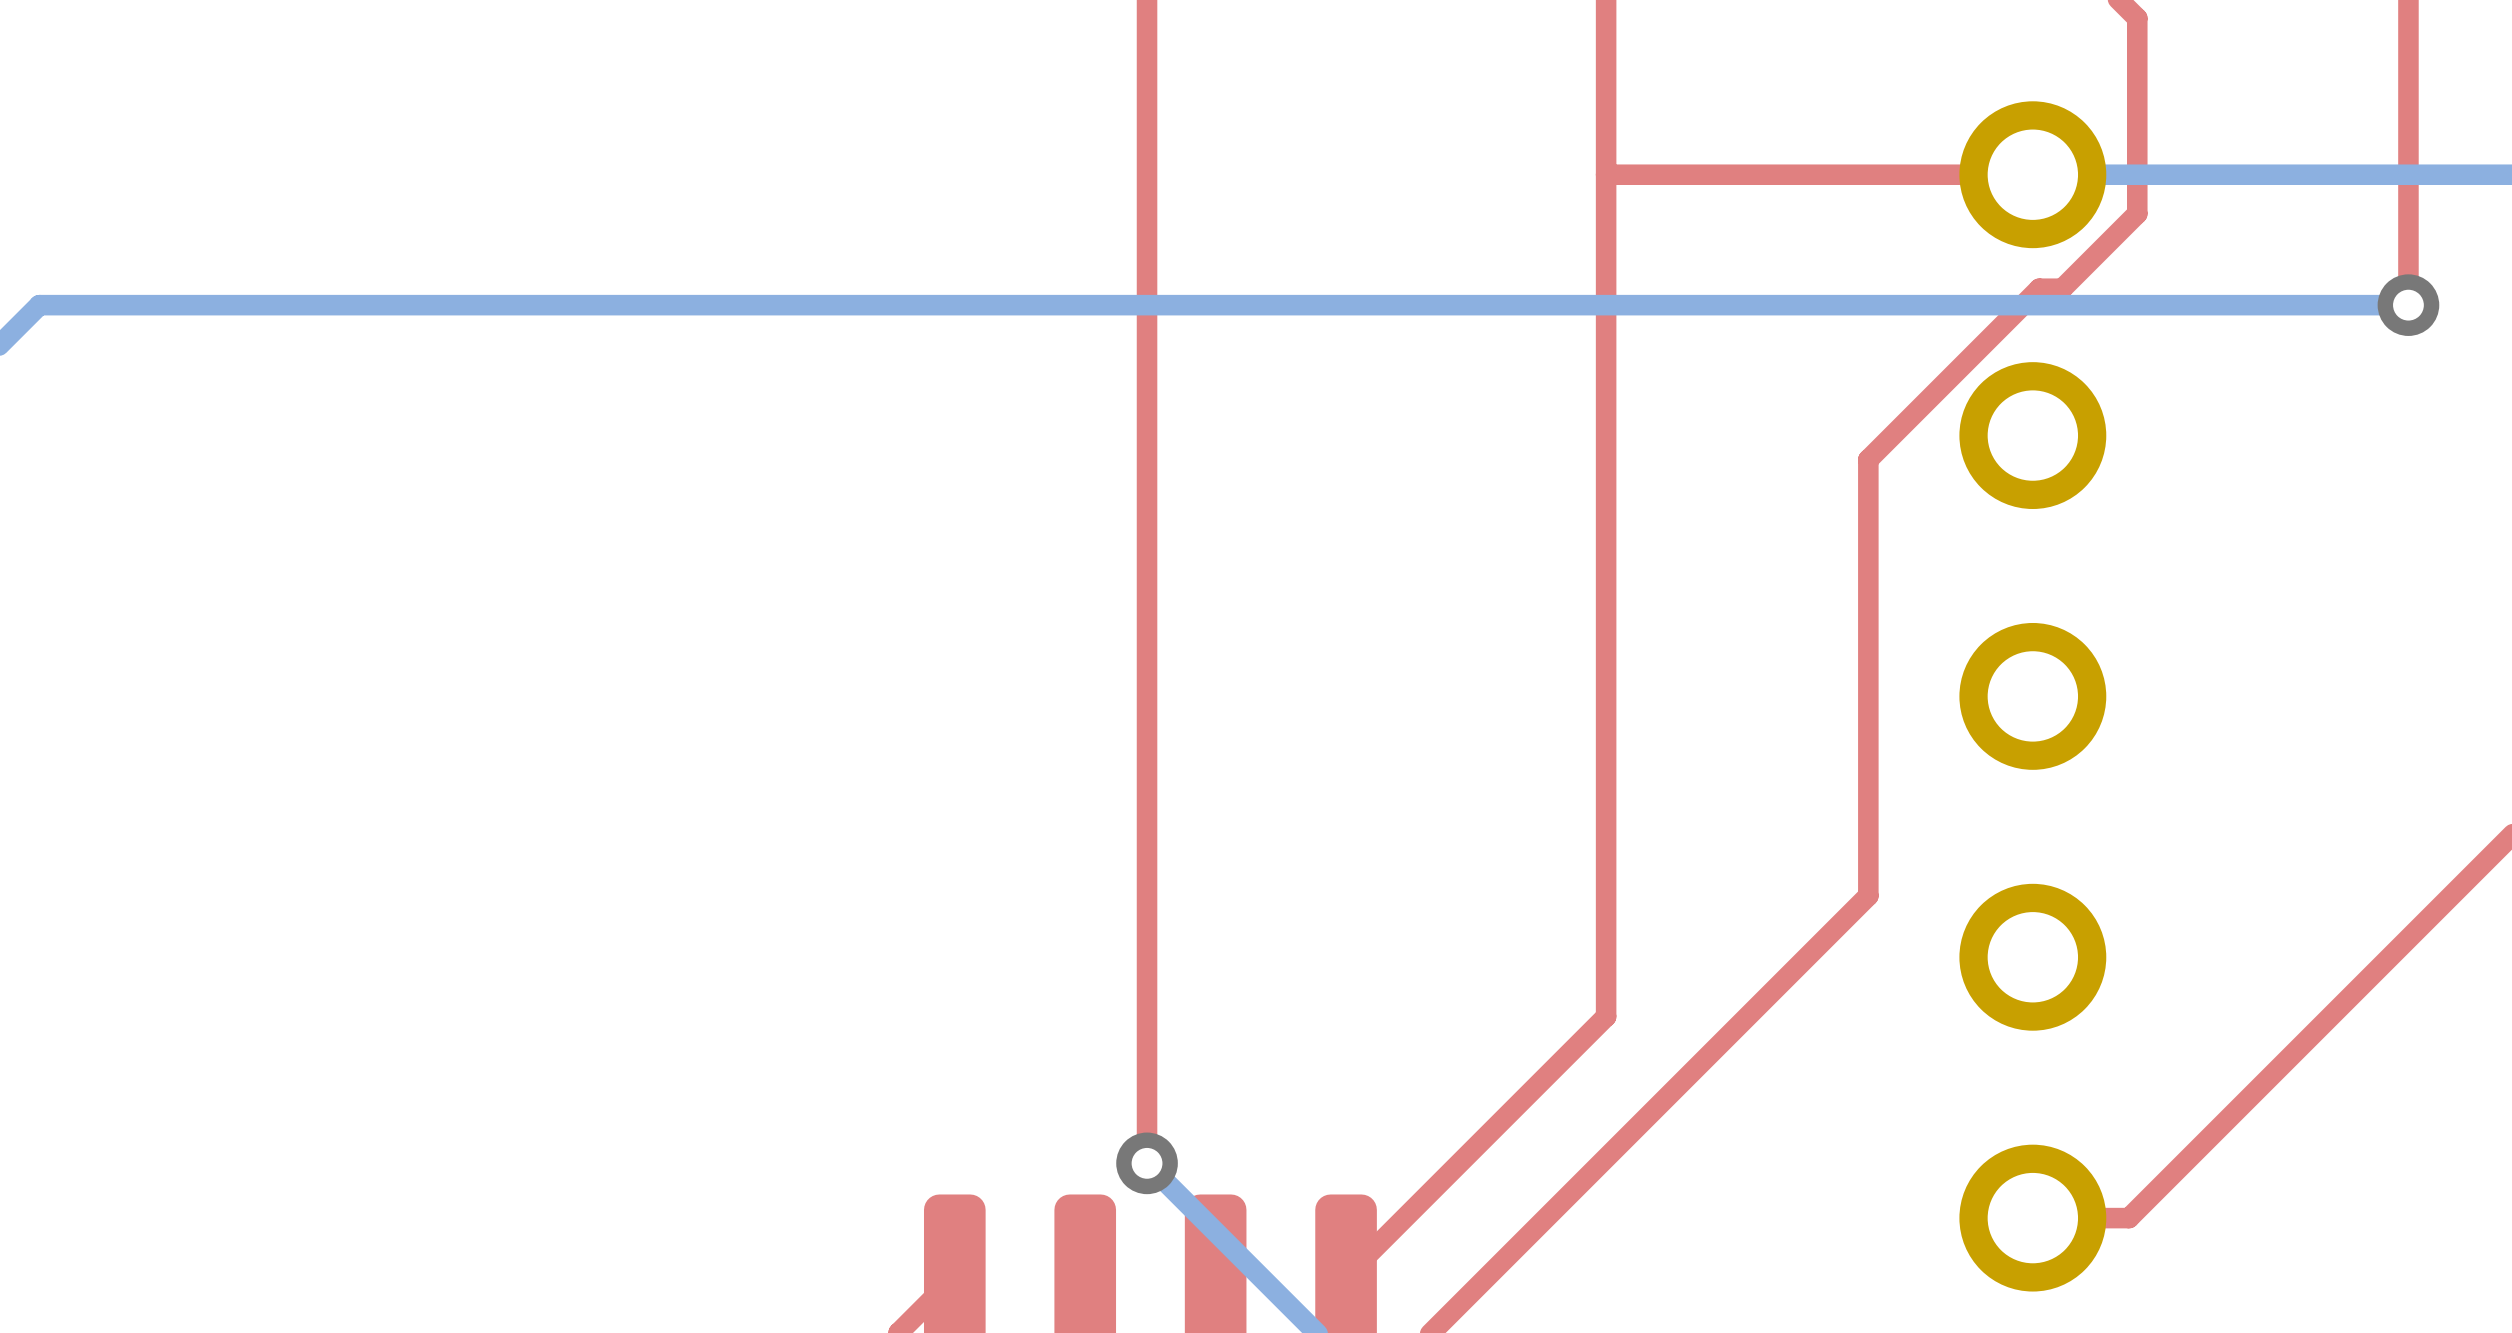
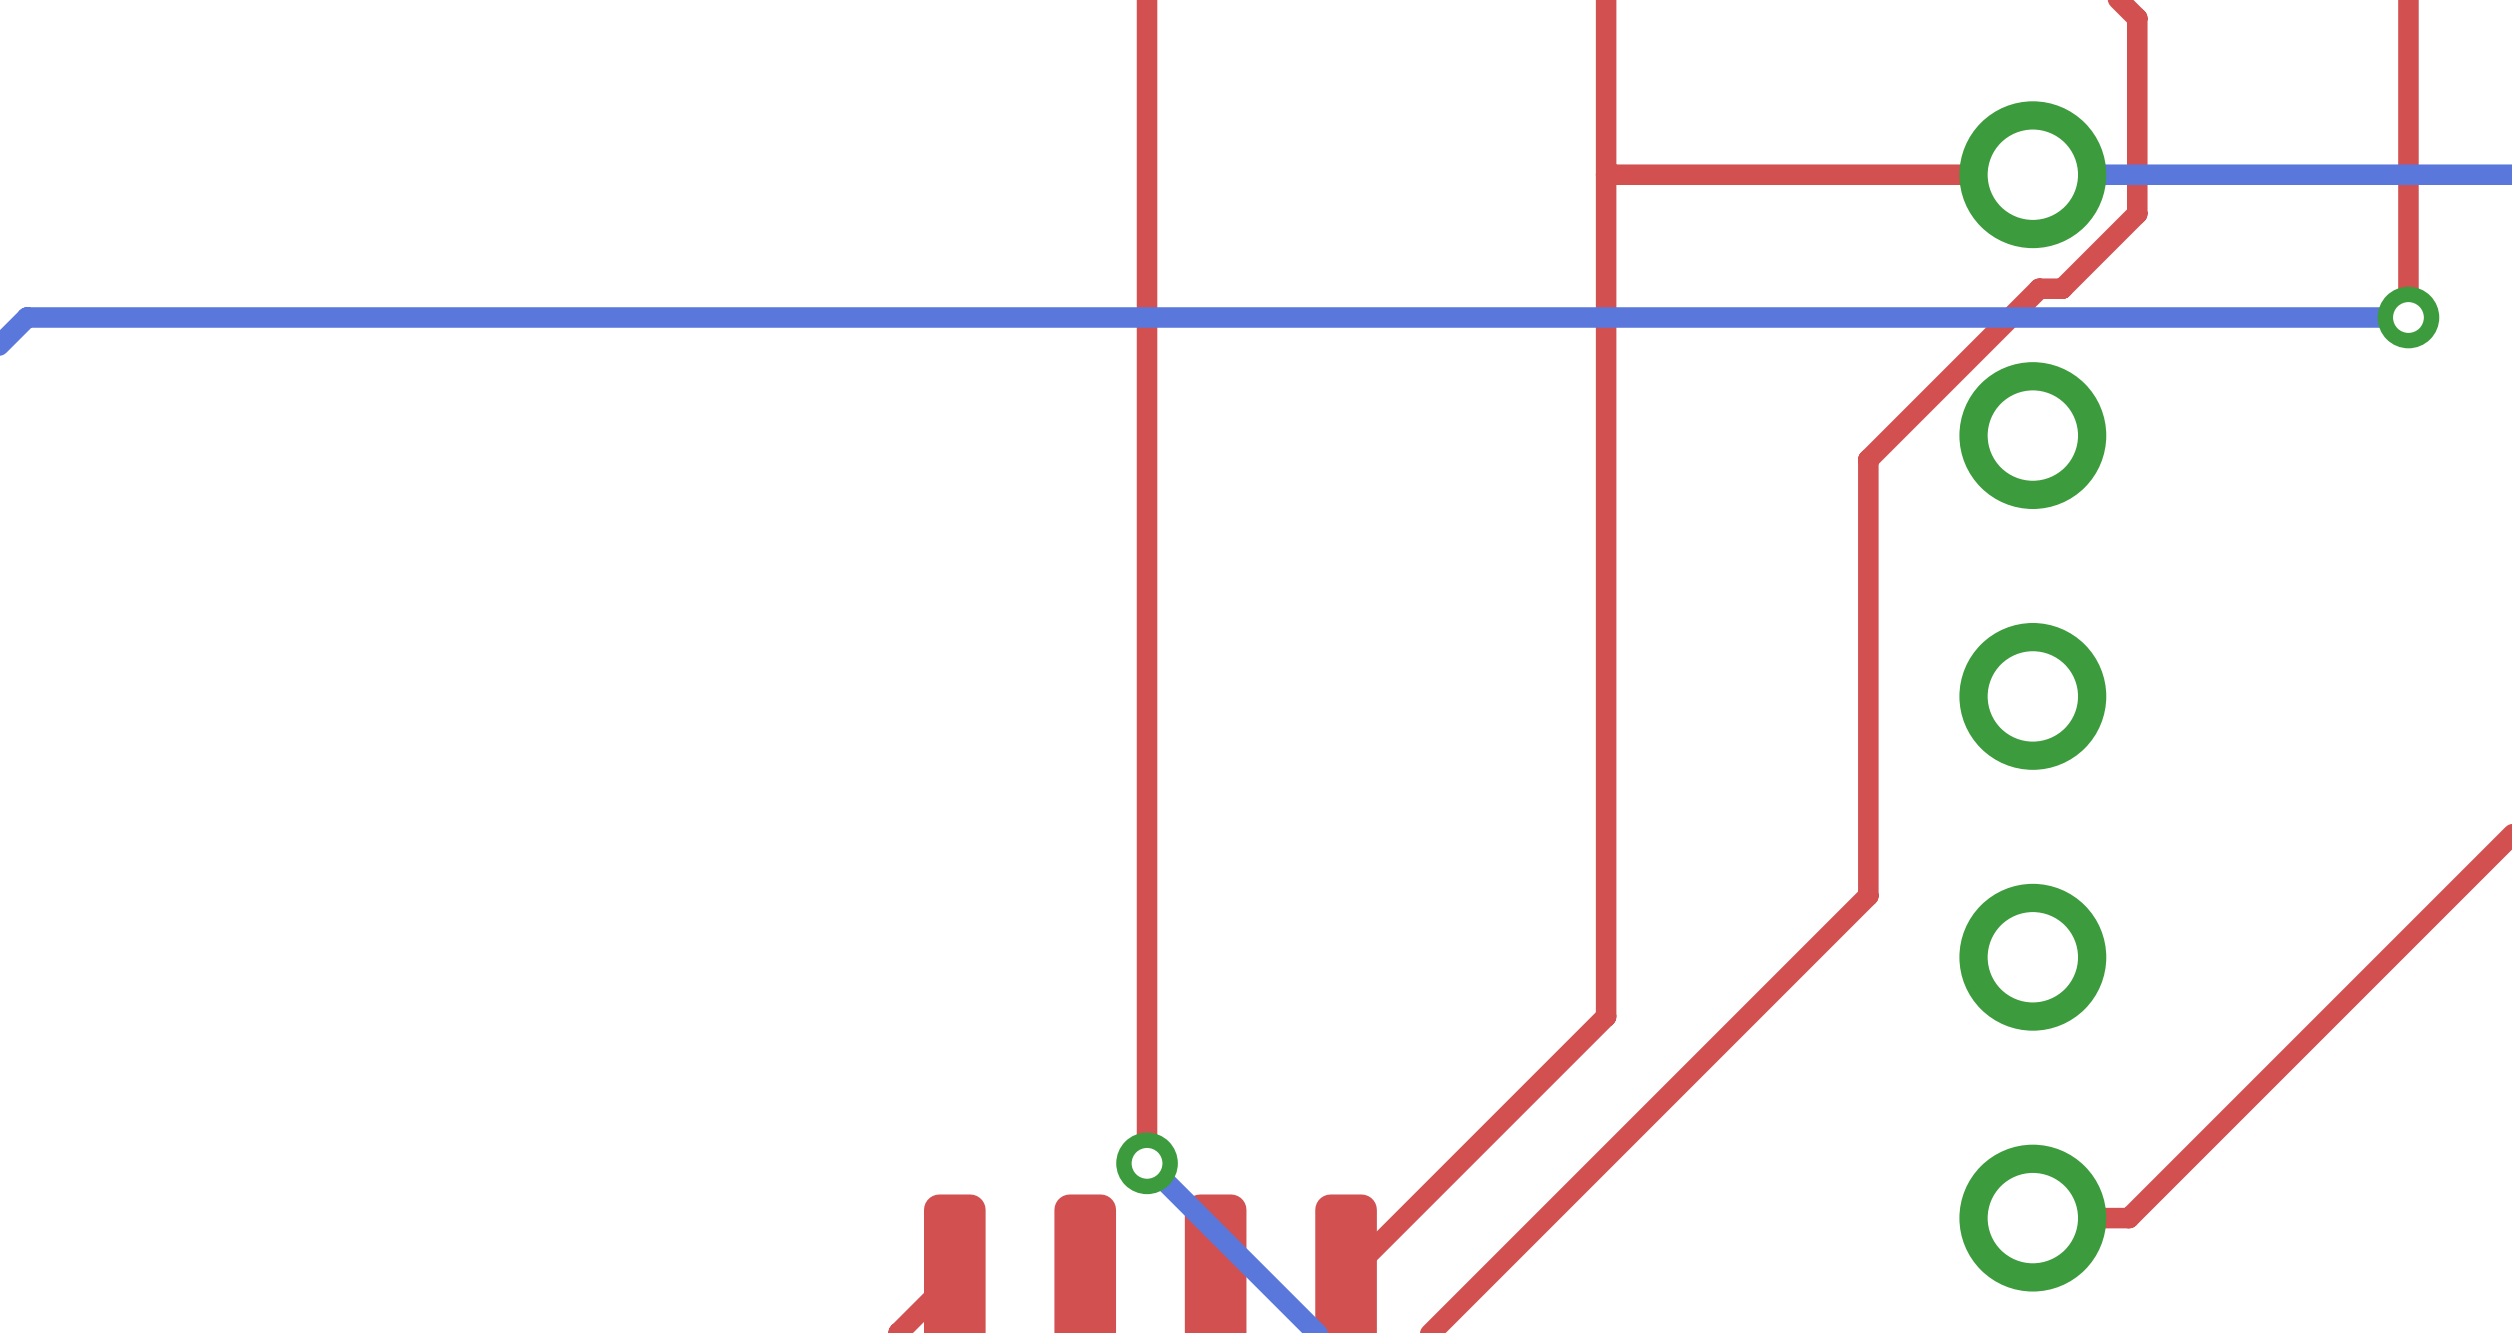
bottom track: (2408, 305) (39, 305) (27, 317) -> (2408, 317) (27, 317)
via position: (2408, 305) -> (2408, 317)

